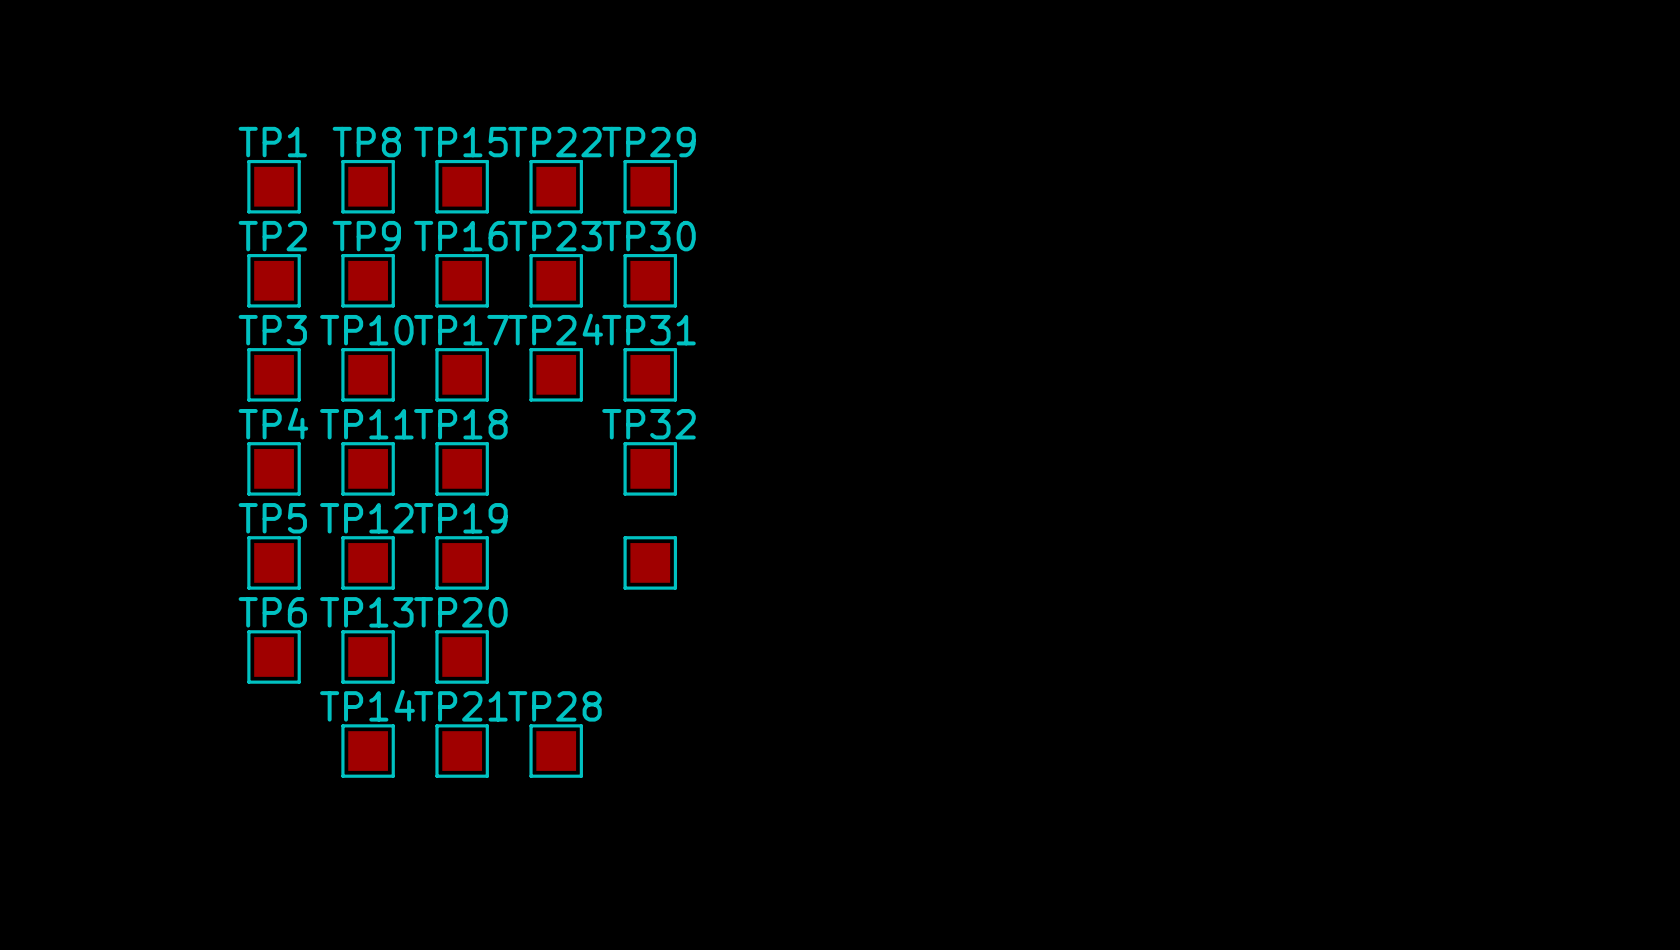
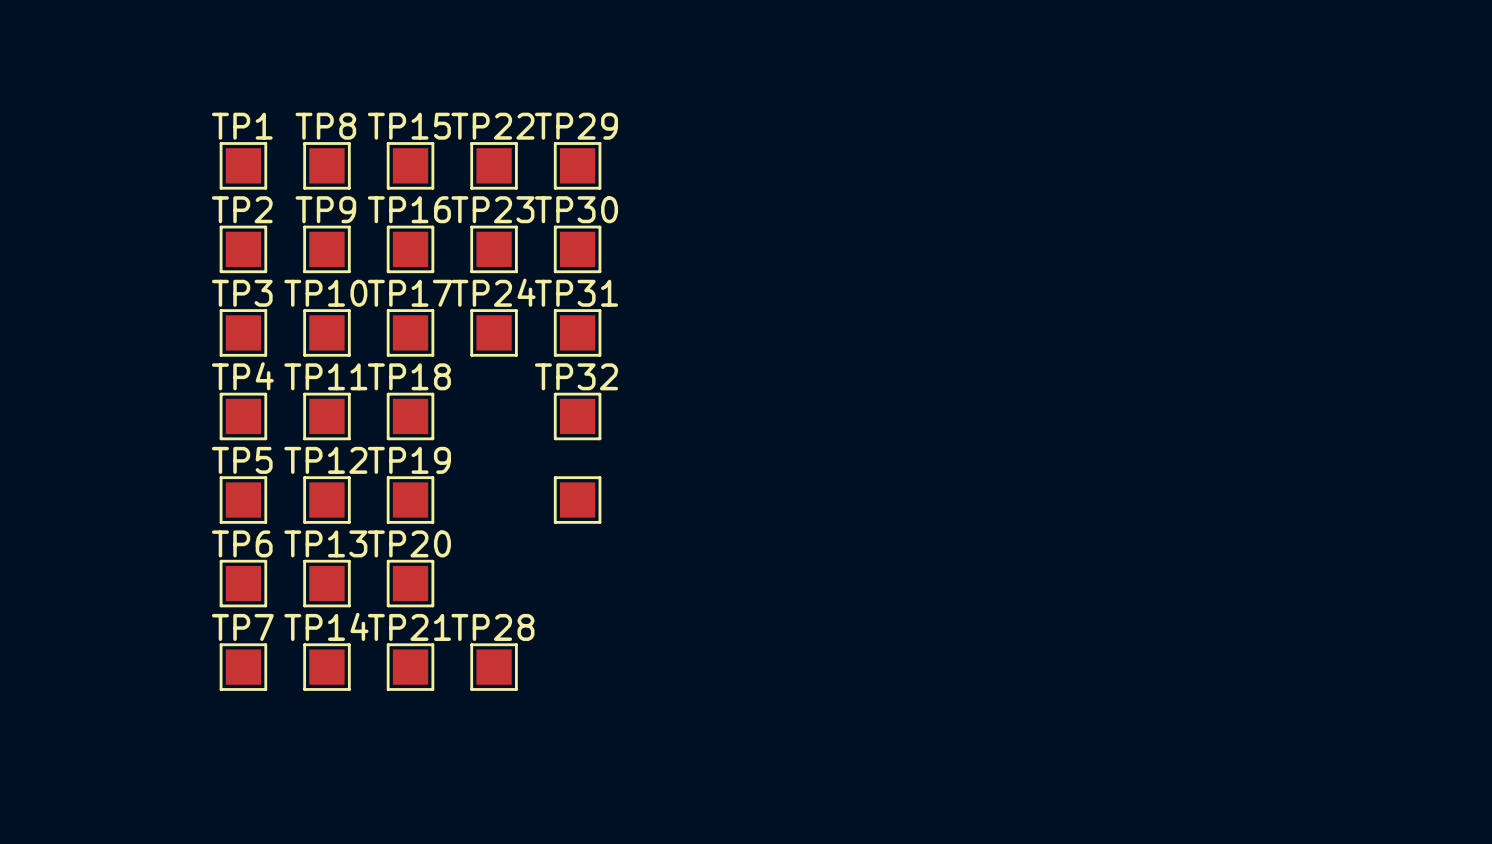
TP7: none -> (243, 667)

